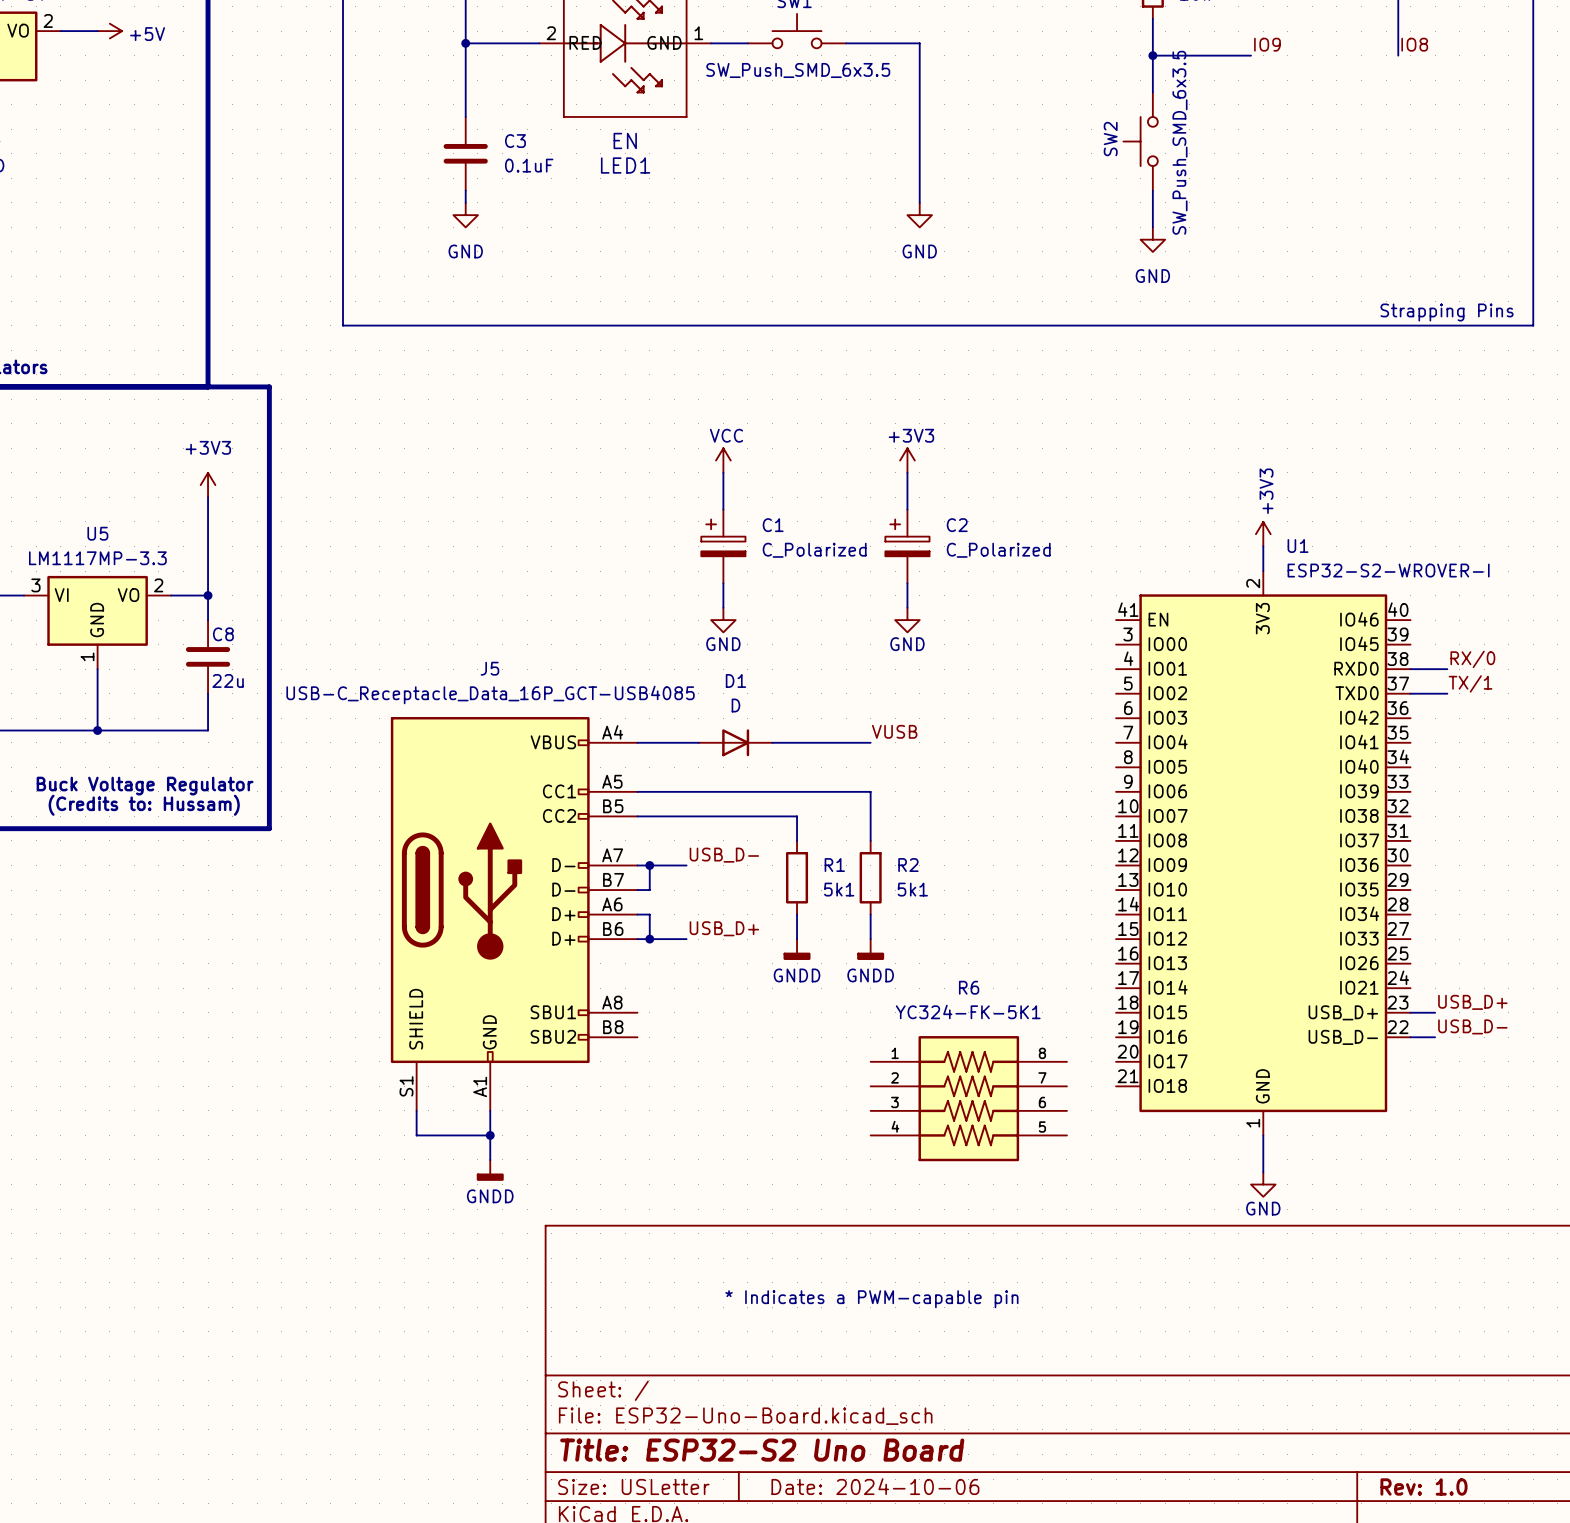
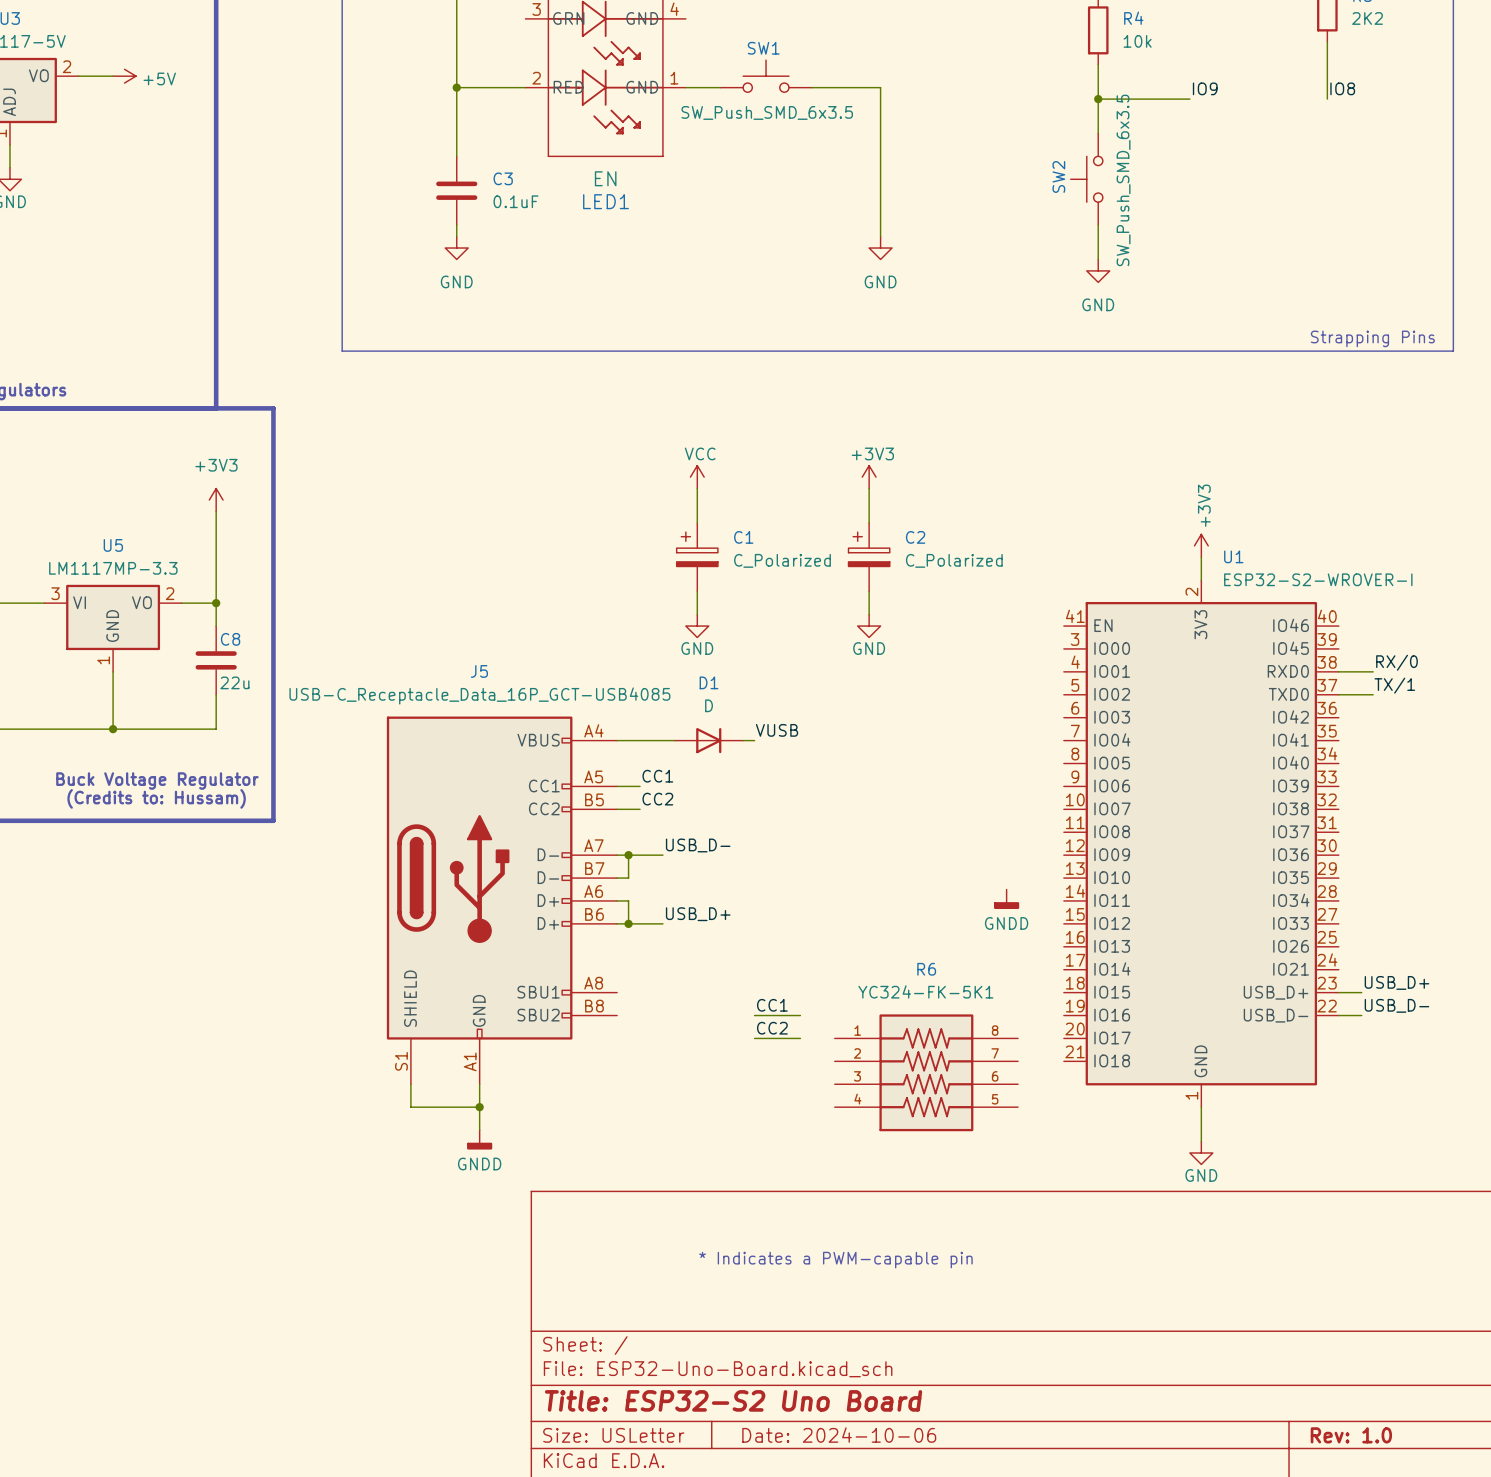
label position: VUSB (894, 731) -> VUSB (777, 730)
wire: (784, 742) (870, 742) -> none
label: none -> CC1 (657, 776)
wire: (662, 791) (870, 791) (870, 840) -> none
label: none -> CC2 (657, 799)
wire: (662, 816) (797, 816) (797, 840) -> none
R1: 5k1 (797, 877) -> none
R2: 5k1 (870, 877) -> none
power symbol: none -> GNDD (1006, 899)
wire: (797, 914) (797, 939) -> none
wire: (870, 914) (870, 939) -> none
power symbol: GNDD (797, 949) -> none
power symbol: GNDD (870, 949) -> none
label: none -> CC1 (772, 1005)
wire: none -> (754, 1015) (800, 1015)
label: none -> CC2 (772, 1028)
wire: none -> (754, 1038) (800, 1038)

